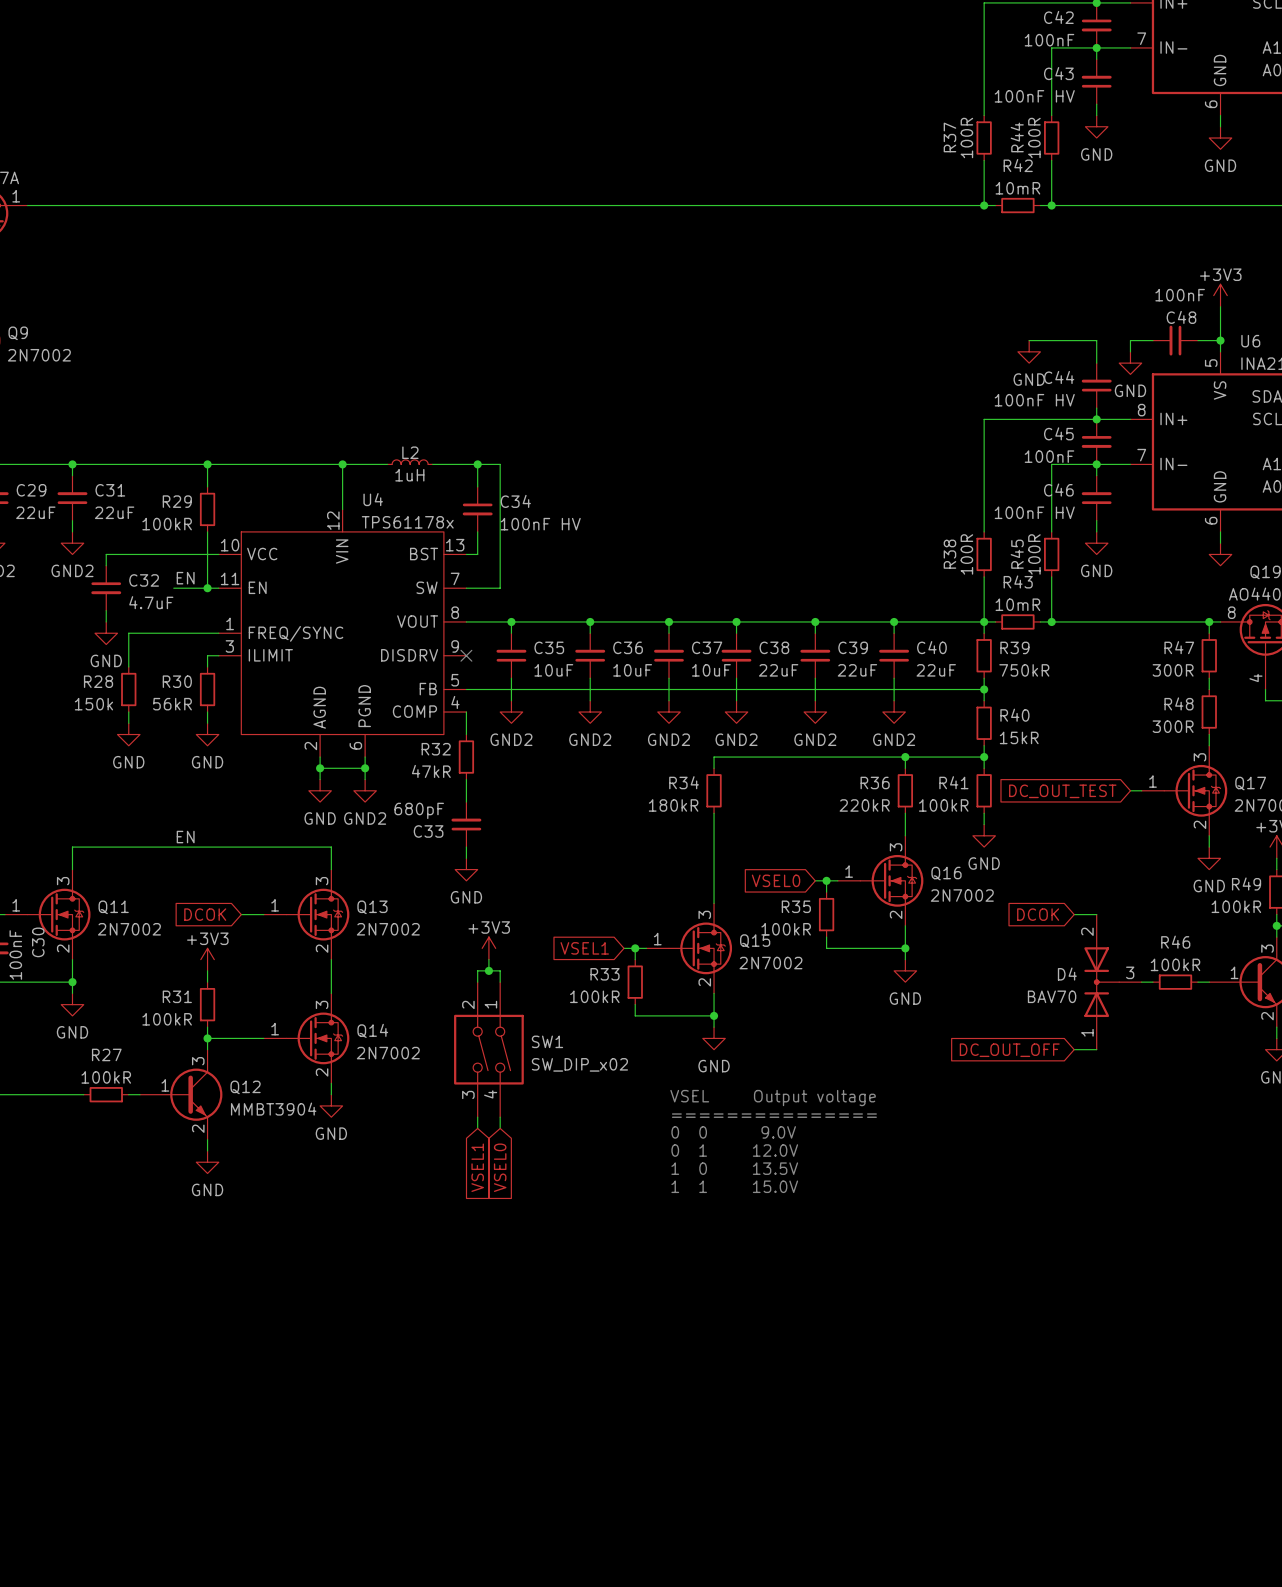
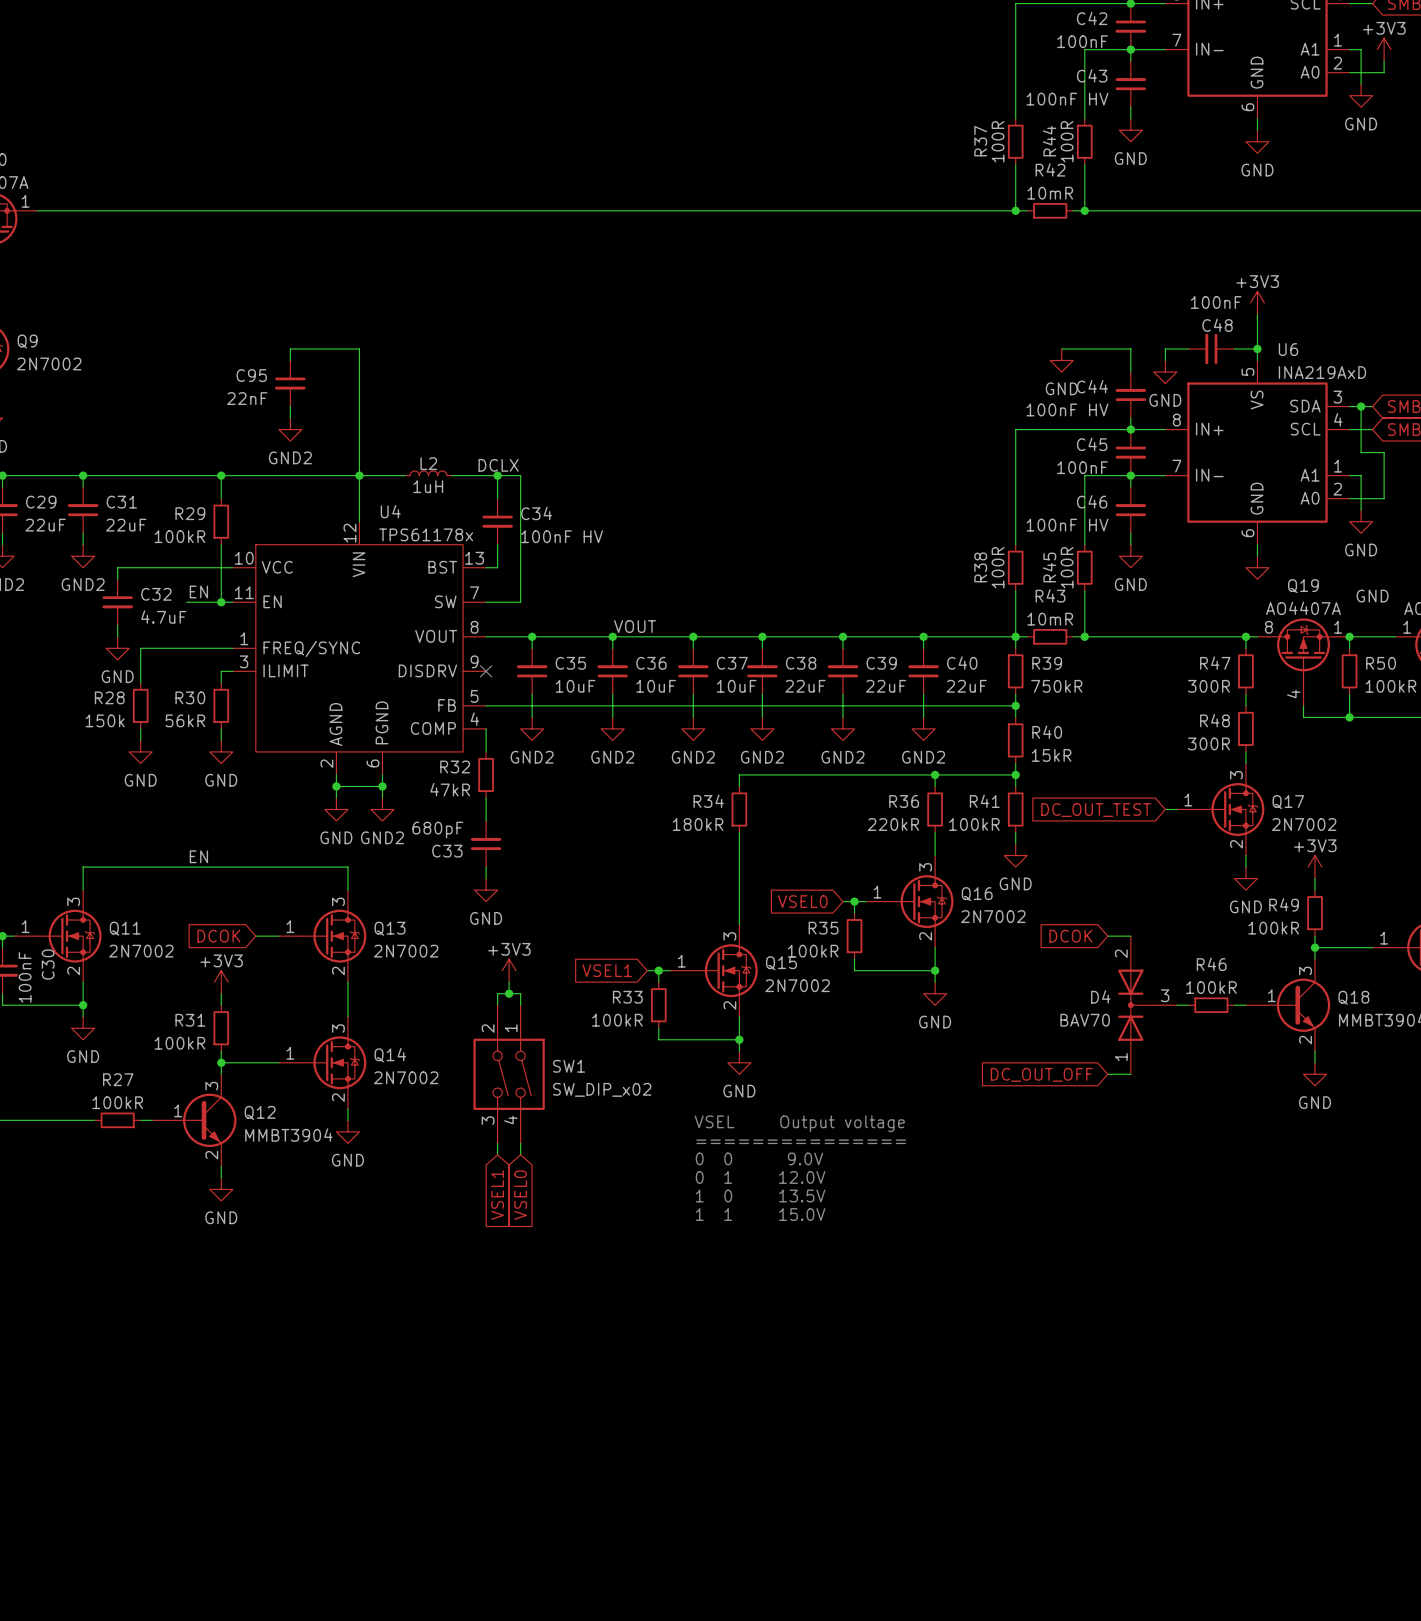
wire: none -> (290, 360) (290, 348) (359, 348) (359, 475)
C95: none -> 22nF (290, 383)
wire: none -> (290, 406) (290, 418)
power symbol: none -> GND2 (290, 429)
label: none -> DCLX (498, 465)
label: none -> VOUT (635, 626)

